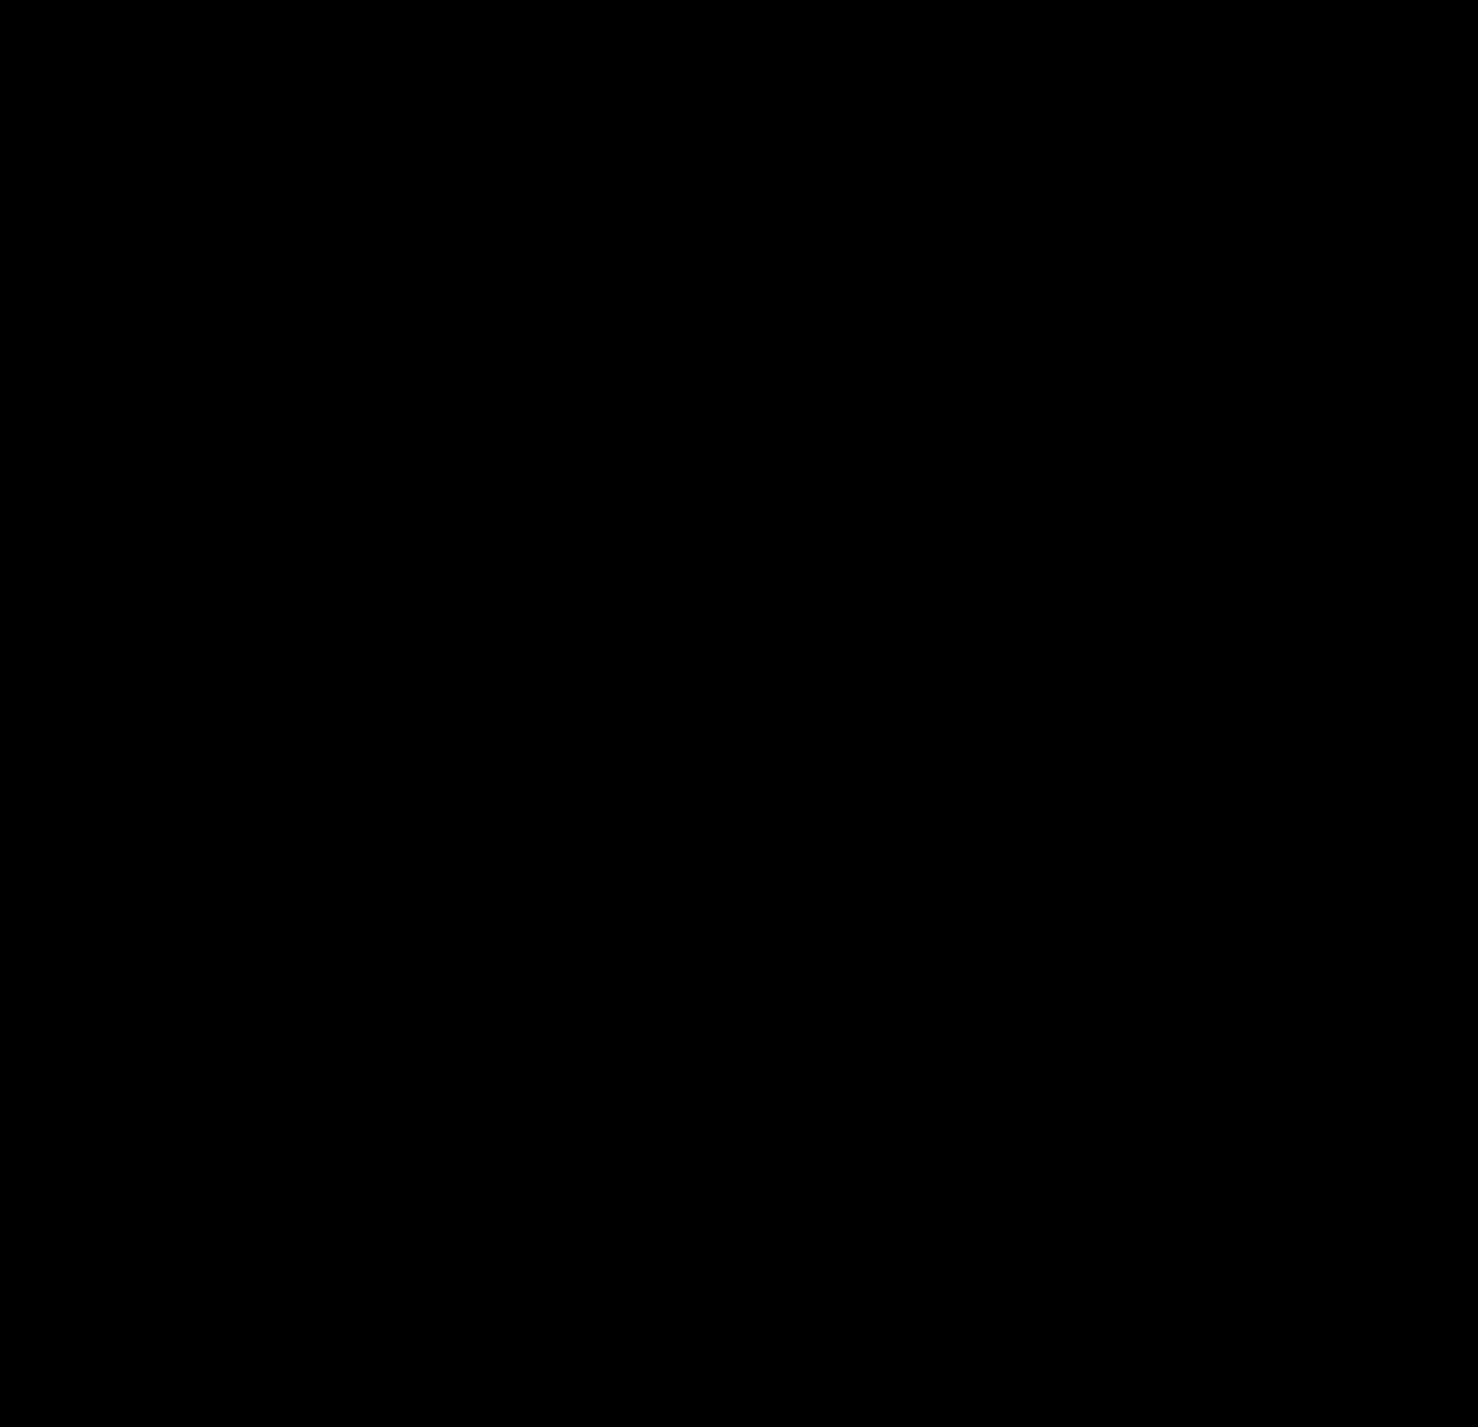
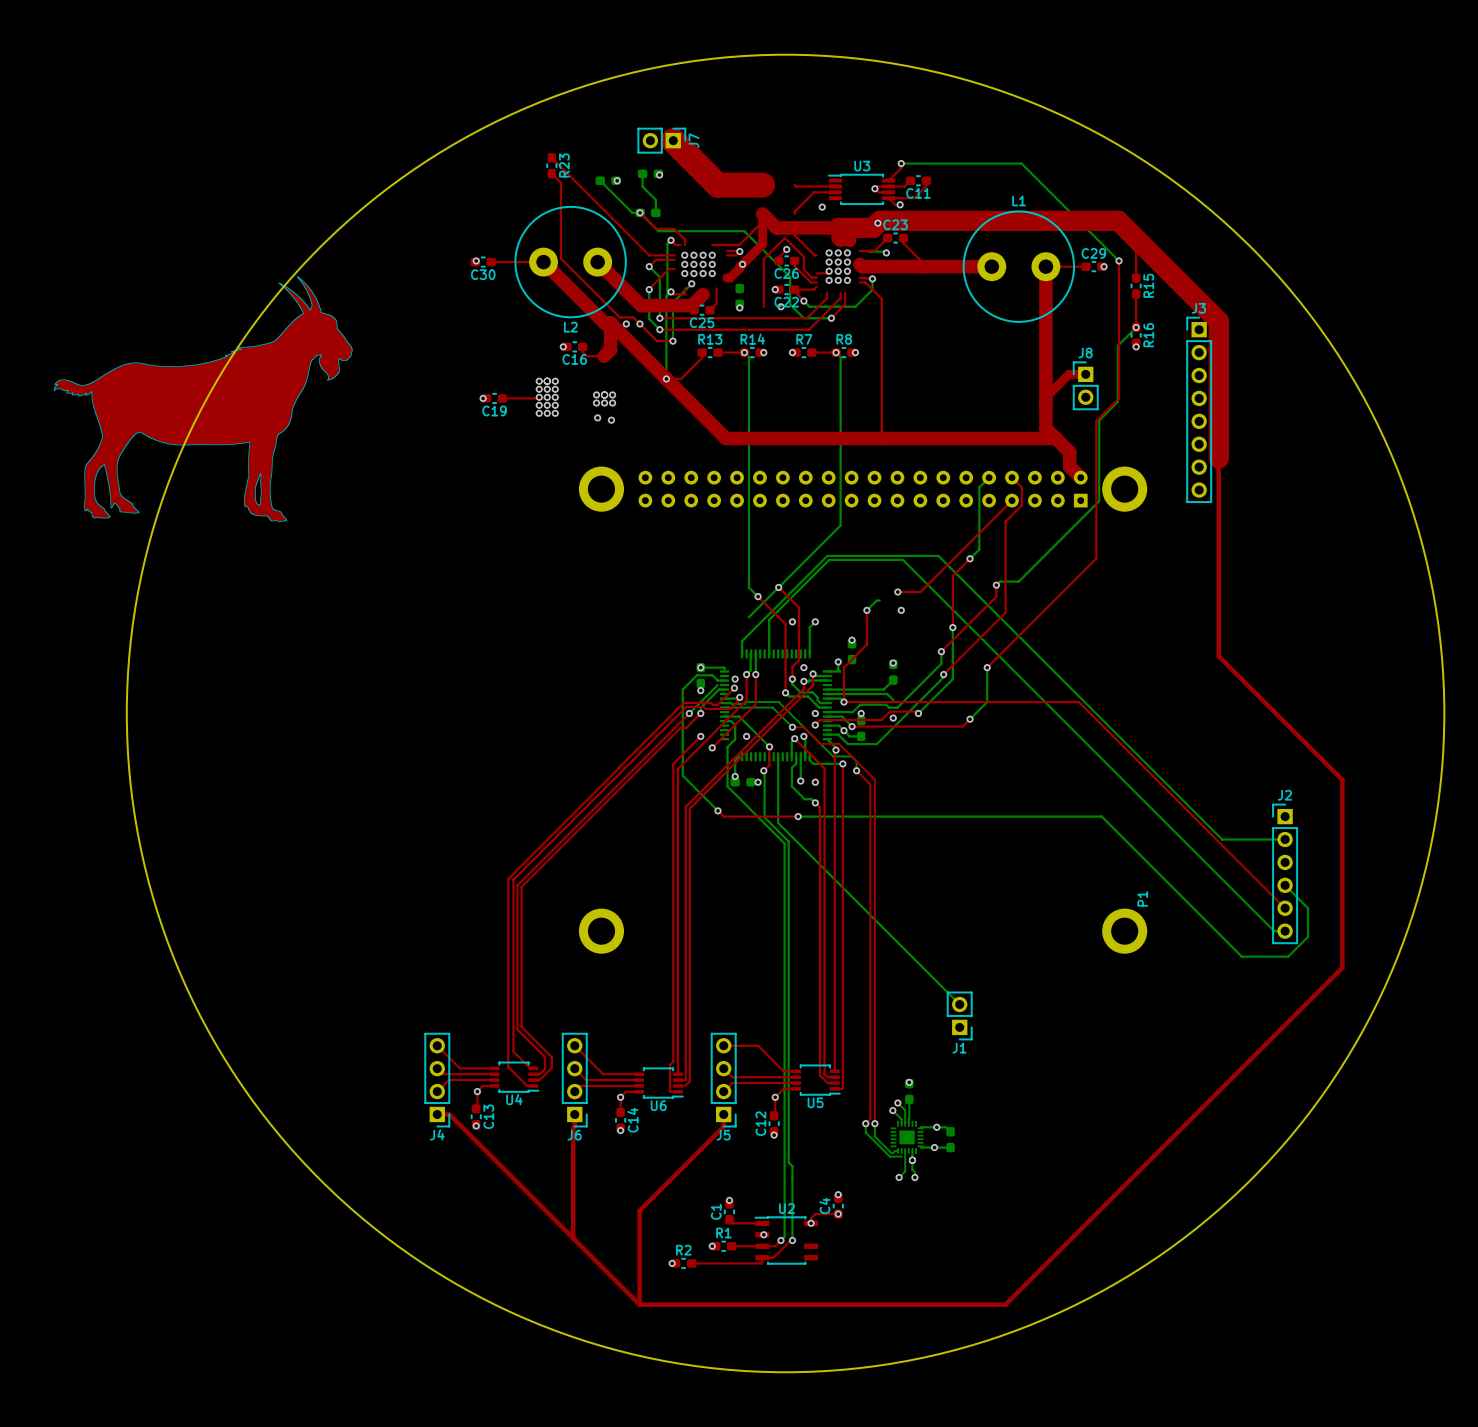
round board edge: none -> [125, 53, 1446, 1374]
J7: none -> (661, 140)
top track: none -> (673, 140) (717, 185) (762, 185)
top track: none -> (551, 157) (649, 255) (674, 255)
top track: none -> (901, 163) (901, 168) (888, 180)
bottom track: none -> (901, 163) (1021, 163) (1118, 260)
via: none -> (901, 163)
R23: none -> (551, 165)
top track: none -> (551, 173) (560, 182) (560, 258) (619, 317) (633, 317) (657, 341) (672, 341)
bottom track: none -> (642, 173) (642, 186) (655, 199) (655, 212)
part: none -> (650, 173)
via: none -> (659, 175)
bottom track: none -> (600, 180) (632, 212) (640, 212) (658, 231) (744, 231) (790, 276) (790, 304) (803, 318) (831, 318)
part: none -> (608, 180)
via: none -> (617, 180)
top track: none -> (910, 180) (904, 186) (877, 186) (874, 188) (878, 192) (888, 192)
C11: none -> (918, 180)
top track: none -> (926, 180) (926, 185) (914, 198) (888, 198) (895, 204) (900, 204)
top track: none -> (794, 185) (835, 186)
via: none -> (874, 188)
U3: none -> (861, 189)
top track: none -> (835, 192) (814, 192) (794, 211) (794, 213)
via: none -> (900, 204)
via: none -> (822, 207)
top track: none -> (640, 212) (656, 228) (674, 228) (685, 239) (685, 245)
via: none -> (640, 212)
part: none -> (647, 212)
top track: none -> (762, 213) (762, 221) (739, 245) (712, 245)
top track: none -> (762, 213) (776, 227) (847, 227) (847, 238) (849, 240)
top track: none -> (762, 213) (762, 244) (730, 277) (726, 277)
via: none -> (877, 223)
top track: none -> (794, 227) (794, 235) (816, 255)
top track: none -> (887, 238) (874, 250) (859, 250)
C23: none -> (895, 238)
top track: none -> (903, 238) (903, 243) (924, 263) (924, 266)
top track: none -> (671, 240) (675, 245) (680, 245)
bottom track: none -> (671, 240) (667, 243) (667, 295)
via: none -> (671, 240)
top track: none -> (840, 240) (838, 238) (838, 227) (873, 227) (880, 220) (1118, 220) (1218, 321) (1218, 656) (1342, 779) (1342, 967) (1005, 1304) (639, 1304)
top track: none -> (1141, 244) (1136, 250) (1136, 278)
top track: none -> (786, 249) (778, 257) (778, 260)
via: none -> (786, 249)
top track: none -> (726, 250) (739, 251) (735, 255) (726, 255)
via: none -> (739, 251)
bottom track: none -> (868, 251) (886, 252)
via: none -> (829, 252)
via: none -> (838, 252)
via: none -> (847, 252)
via: none -> (886, 252)
via: none -> (684, 255)
via: none -> (693, 255)
via: none -> (703, 255)
via: none -> (712, 255)
top track: none -> (674, 259) (656, 259) (649, 266)
via: none -> (476, 260)
C26: none -> (786, 260)
top track: none -> (794, 260) (794, 266) (810, 282) (816, 282)
top track: none -> (1118, 260) (1118, 398) (1096, 421) (1096, 558) (987, 667)
via: none -> (1118, 260)
C30: none -> (483, 262)
top track: none -> (491, 262) (543, 262) (604, 323) (610, 323)
L2: none -> (570, 262)
top track: none -> (597, 262) (641, 305) (691, 305) (703, 294)
via: none -> (829, 262)
via: none -> (838, 262)
via: none -> (847, 262)
via: none -> (684, 264)
via: none -> (693, 264)
via: none -> (703, 264)
via: none -> (712, 264)
via: none -> (742, 264)
top track: none -> (859, 264) (862, 266) (991, 266)
bottom track: none -> (649, 266) (659, 277) (659, 318)
via: none -> (649, 266)
L1: none -> (1018, 266)
top track: none -> (1086, 266) (1045, 266) (1045, 428) (1069, 452) (1069, 466) (1080, 477)
C29: none -> (1093, 266)
via: none -> (1104, 266)
top track: none -> (674, 268) (669, 268) (649, 289)
top track: none -> (829, 271) (826, 273) (816, 273)
via: none -> (829, 271)
via: none -> (838, 271)
via: none -> (847, 271)
via: none -> (684, 273)
via: none -> (693, 273)
via: none -> (703, 273)
via: none -> (712, 273)
drawing: none -> [53, 276, 353, 522]
top track: none -> (816, 277) (811, 277) (803, 269) (803, 256) (784, 238) (763, 259) (763, 306)
top track: none -> (859, 277) (872, 278)
bottom track: none -> (872, 278) (872, 289) (855, 306) (809, 306) (803, 301)
via: none -> (872, 278)
via: none -> (829, 280)
via: none -> (838, 280)
via: none -> (847, 280)
top track: none -> (859, 282) (865, 282) (881, 298) (881, 438)
bottom track: none -> (691, 283) (672, 302) (672, 341)
via: none -> (691, 283)
top track: none -> (816, 286) (814, 289) (794, 289) (803, 301)
R15: none -> (1136, 286)
top track: none -> (685, 288) (684, 294) (673, 294) (671, 291)
top track: none -> (716, 288) (716, 303) (709, 310)
bottom track: none -> (649, 289) (649, 319) (659, 329)
via: none -> (649, 289)
via: none -> (775, 289)
C22: none -> (786, 289)
bottom track: none -> (671, 291) (666, 296) (666, 378)
via: none -> (671, 291)
top track: none -> (827, 292) (827, 298) (807, 318) (659, 318)
top track: none -> (840, 292) (840, 298) (809, 329) (659, 329)
top track: none -> (845, 292) (845, 304) (831, 318)
top track: none -> (1136, 293) (1136, 327)
part: none -> (739, 296)
via: none -> (803, 301)
via: none -> (780, 306)
via: none -> (739, 307)
C25: none -> (702, 310)
via: none -> (659, 318)
via: none -> (831, 318)
top track: none -> (610, 323) (726, 438) (1055, 438)
top track: none -> (610, 323) (610, 349) (604, 356) (586, 356) (582, 352) (582, 346)
via: none -> (626, 323)
via: none -> (639, 323)
bottom track: none -> (1136, 327) (1117, 345) (1117, 401) (1099, 420) (1099, 501) (1018, 581) (999, 581) (996, 585)
via: none -> (1136, 327)
via: none -> (659, 329)
R16: none -> (1136, 335)
via: none -> (672, 341)
via: none -> (563, 346)
C16: none -> (574, 346)
via: none -> (1136, 346)
top track: none -> (702, 352) (702, 357) (681, 378) (666, 378)
R13: none -> (710, 352)
top track: none -> (717, 352) (744, 352)
bottom track: none -> (744, 352) (748, 357) (748, 587) (758, 596)
via: none -> (744, 352)
R14: none -> (752, 352)
via: none -> (763, 352)
via: none -> (792, 352)
R7: none -> (803, 352)
top track: none -> (811, 352) (836, 352)
bottom track: none -> (836, 352) (840, 357) (840, 525) (748, 617)
via: none -> (836, 352)
R8: none -> (844, 352)
via: none -> (855, 352)
top track: none -> (1085, 374) (1069, 374) (1045, 397) (1045, 401)
via: none -> (666, 378)
via: none -> (539, 381)
via: none -> (547, 381)
via: none -> (555, 381)
J8: none -> (1085, 385)
via: none -> (539, 389)
via: none -> (547, 389)
via: none -> (555, 389)
top track: none -> (549, 394) (546, 398) (502, 398)
via: none -> (596, 394)
via: none -> (604, 394)
via: none -> (612, 394)
via: none -> (539, 397)
via: none -> (547, 397)
via: none -> (555, 397)
via: none -> (483, 398)
C19: none -> (494, 398)
via: none -> (596, 403)
via: none -> (604, 403)
via: none -> (612, 403)
via: none -> (539, 405)
via: none -> (547, 405)
via: none -> (555, 405)
J3: none -> (1199, 409)
via: none -> (539, 413)
via: none -> (547, 413)
via: none -> (555, 413)
via: none -> (597, 417)
via: none -> (611, 420)
bottom track: none -> (989, 477) (979, 487) (979, 549) (970, 558)
top track: none -> (1012, 477) (1021, 487) (1021, 505) (1005, 521) (1005, 612) (943, 674)
top track: none -> (1012, 500) (920, 592) (897, 592)
top track: none -> (970, 558) (952, 576) (952, 627)
via: none -> (970, 558)
top track: none -> (996, 585) (996, 596) (941, 651)
via: none -> (996, 585)
top track: none -> (778, 587) (798, 607) (798, 660) (792, 666) (792, 679)
via: none -> (778, 587)
via: none -> (897, 592)
top track: none -> (758, 596) (785, 624) (785, 692)
via: none -> (758, 596)
bottom track: none -> (879, 600) (876, 600) (866, 610)
top track: none -> (866, 610) (866, 644) (844, 667) (844, 702) (1078, 702) (1285, 908)
via: none -> (866, 610)
via: none -> (901, 610)
via: none -> (792, 621)
bottom track: none -> (815, 621) (809, 627) (809, 653)
via: none -> (815, 621)
bottom track: none -> (952, 627) (952, 679) (918, 713)
via: none -> (952, 627)
via: none -> (852, 640)
part: none -> (852, 651)
bottom track: none -> (941, 651) (941, 663) (897, 707) (889, 707) (886, 704) (860, 704) (852, 712) (827, 712)
via: none -> (941, 651)
bottom track: none -> (742, 653) (742, 641) (827, 555) (938, 555) (1222, 839) (1285, 839)
bottom track: none -> (751, 653) (750, 670) (746, 674)
bottom track: none -> (755, 653) (755, 674)
bottom track: none -> (769, 653) (769, 619) (829, 559) (903, 559) (1274, 931) (1285, 931)
bottom track: none -> (838, 661) (840, 671) (827, 671)
via: none -> (838, 661)
via: none -> (893, 663)
bottom track: none -> (700, 667) (724, 667) (724, 671)
via: none -> (700, 667)
via: none -> (803, 667)
bottom track: none -> (987, 667) (987, 702) (970, 719)
via: none -> (987, 667)
part: none -> (893, 672)
top track: none -> (813, 673) (813, 685) (689, 808) (689, 1081) (685, 1085) (677, 1085)
bottom track: none -> (813, 673) (815, 676) (827, 676)
via: none -> (813, 673)
top track: none -> (746, 674) (746, 700) (677, 768) (677, 1074)
via: none -> (746, 674)
top track: none -> (755, 674) (755, 704) (712, 747)
via: none -> (755, 674)
bottom track: none -> (943, 674) (943, 677) (876, 744) (847, 744) (838, 734) (827, 734)
via: none -> (943, 674)
part: none -> (700, 675)
via: none -> (735, 679)
bottom track: none -> (792, 679) (792, 684) (800, 692) (812, 692) (820, 703) (827, 703)
via: none -> (792, 679)
bottom track: none -> (724, 680) (717, 680) (712, 675) (697, 675) (682, 689) (682, 775) (717, 810)
bottom track: none -> (827, 680) (803, 681)
bottom track: none -> (893, 680) (883, 689) (827, 689)
top track: none -> (803, 681) (803, 688) (685, 806) (685, 1079) (677, 1080)
via: none -> (803, 681)
bottom track: none -> (717, 685) (689, 713)
top track: none -> (734, 688) (717, 704) (710, 702) (683, 702) (508, 879) (508, 1067) (527, 1085) (533, 1085)
via: none -> (734, 688)
bottom track: none -> (724, 689) (718, 689) (700, 707) (700, 713)
via: none -> (700, 690)
bottom track: none -> (785, 692) (789, 696) (808, 696) (819, 707) (827, 707)
via: none -> (785, 692)
bottom track: none -> (827, 694) (887, 694) (893, 699)
top track: none -> (739, 697) (730, 709) (686, 706) (513, 879) (513, 1051) (530, 1068) (533, 1068)
bottom track: none -> (739, 697) (724, 698)
via: none -> (739, 697)
bottom track: none -> (827, 698) (840, 698) (844, 702)
via: none -> (844, 702)
bottom track: none -> (724, 703) (778, 702) (833, 756) (851, 756) (856, 761) (856, 770)
part: none -> (775, 705)
bottom track: none -> (724, 707) (772, 707) (792, 727)
P1: none -> (863, 710)
top track: none -> (689, 713) (517, 885) (517, 1029) (544, 1057) (544, 1068) (539, 1074) (533, 1074)
via: none -> (689, 713)
top track: none -> (700, 713) (686, 727) (680, 727) (521, 887) (521, 1026) (551, 1057) (551, 1067) (539, 1080) (533, 1080)
via: none -> (700, 713)
via: none -> (815, 713)
via: none -> (861, 713)
top track: none -> (918, 713) (916, 711) (890, 711) (881, 720) (820, 720) (815, 725)
via: none -> (918, 713)
bottom track: none -> (724, 716) (739, 716) (769, 746)
bottom track: none -> (827, 716) (842, 716) (852, 726)
via: none -> (893, 718)
top track: none -> (970, 719) (962, 726) (852, 726)
via: none -> (970, 719)
bottom track: none -> (724, 721) (731, 721) (735, 725) (735, 739) (727, 747) (727, 786) (784, 843) (784, 1236) (780, 1240)
via: none -> (815, 725)
bottom track: none -> (827, 725) (838, 725) (849, 736) (861, 736) (858, 739)
via: none -> (852, 726)
top track: none -> (792, 727) (803, 727) (820, 743) (839, 743) (874, 779) (874, 1123)
via: none -> (792, 727)
part: none -> (861, 728)
via: none -> (844, 730)
top track: none -> (700, 736) (673, 763) (673, 1061) (669, 1065) (669, 1091) (677, 1091)
via: none -> (700, 736)
via: none -> (746, 736)
bottom track: none -> (803, 736) (805, 756)
via: none -> (803, 736)
top track: none -> (794, 738) (824, 768) (824, 1074) (827, 1077) (834, 1077)
bottom track: none -> (794, 738) (791, 741) (791, 756)
via: none -> (794, 738)
bottom track: none -> (827, 739) (835, 750)
top track: none -> (769, 746) (769, 765) (763, 770)
via: none -> (769, 746)
via: none -> (712, 747)
top track: none -> (835, 750) (834, 1071)
via: none -> (835, 750)
bottom track: none -> (742, 756) (738, 756) (735, 760) (735, 782)
bottom track: none -> (778, 756) (778, 822) (959, 1004)
bottom track: none -> (796, 756) (796, 763) (791, 767) (791, 786) (804, 799) (811, 799) (815, 802)
bottom track: none -> (800, 756) (799, 782)
bottom track: none -> (809, 756) (809, 760) (813, 763) (842, 763)
top track: none -> (842, 763) (842, 1088) (834, 1088)
via: none -> (842, 763)
bottom track: none -> (763, 770) (764, 817) (788, 841) (788, 1162) (792, 1166) (792, 1240)
via: none -> (763, 770)
top track: none -> (856, 770) (870, 784) (870, 1119) (865, 1123)
via: none -> (856, 770)
via: none -> (735, 776)
via: none -> (800, 781)
part: none -> (743, 782)
via: none -> (758, 782)
via: none -> (815, 782)
top track: none -> (815, 802) (819, 807) (819, 1075) (827, 1083) (834, 1083)
via: none -> (815, 802)
top track: none -> (717, 810) (723, 816) (798, 816)
via: none -> (717, 810)
bottom track: none -> (798, 816) (1101, 816) (1241, 956) (1288, 956) (1308, 936) (1308, 908) (1285, 885)
via: none -> (798, 816)
J2: none -> (1285, 873)
J1: none -> (959, 1015)
top track: none -> (437, 1045) (459, 1068) (494, 1068)
top track: none -> (574, 1045) (603, 1074) (639, 1074)
top track: none -> (723, 1045) (758, 1045) (783, 1071) (795, 1071)
top track: none -> (437, 1068) (442, 1074) (494, 1074)
top track: none -> (574, 1068) (586, 1080) (639, 1080)
top track: none -> (723, 1068) (732, 1077) (795, 1077)
U4: none -> (514, 1077)
J4: none -> (437, 1080)
top track: none -> (494, 1080) (448, 1080) (437, 1091)
J6: none -> (574, 1080)
J5: none -> (723, 1080)
U5: none -> (815, 1080)
via: none -> (909, 1082)
U6: none -> (658, 1083)
top track: none -> (795, 1083) (732, 1083) (723, 1091)
top track: none -> (494, 1085) (482, 1085) (477, 1091) (476, 1106)
top track: none -> (639, 1085) (580, 1085) (574, 1091)
top track: none -> (795, 1088) (783, 1088) (775, 1097) (774, 1115)
via: none -> (477, 1091)
top track: none -> (639, 1091) (626, 1091) (620, 1097) (620, 1112)
part: none -> (909, 1091)
via: none -> (620, 1097)
via: none -> (775, 1097)
bottom track: none -> (909, 1099) (908, 1123)
bottom track: none -> (897, 1103) (905, 1110) (905, 1123)
via: none -> (897, 1103)
bottom track: none -> (892, 1110) (901, 1119) (901, 1123)
via: none -> (892, 1110)
top track: none -> (437, 1114) (449, 1114) (639, 1304)
top track: none -> (574, 1114) (573, 1238)
top track: none -> (723, 1114) (723, 1126) (639, 1210) (639, 1304)
C13: none -> (476, 1116)
C14: none -> (620, 1120)
C12: none -> (774, 1123)
bottom track: none -> (865, 1123) (865, 1132) (889, 1156) (901, 1156)
via: none -> (865, 1123)
bottom track: none -> (874, 1123) (874, 1136) (891, 1152) (897, 1150)
via: none -> (874, 1123)
via: none -> (476, 1125)
via: none -> (936, 1127)
bottom track: none -> (920, 1128) (946, 1127) (950, 1131)
via: none -> (620, 1130)
via: none -> (774, 1135)
part: none -> (907, 1137)
part: none -> (950, 1139)
bottom track: none -> (920, 1146) (950, 1147)
via: none -> (934, 1147)
bottom track: none -> (905, 1150) (905, 1171) (899, 1177)
bottom track: none -> (912, 1150) (912, 1169) (914, 1172) (914, 1177)
via: none -> (912, 1160)
via: none -> (899, 1177)
via: none -> (914, 1177)
via: none -> (838, 1194)
via: none -> (729, 1200)
C4: none -> (838, 1206)
C1: none -> (729, 1211)
top track: none -> (838, 1214) (815, 1214) (811, 1218) (811, 1223)
via: none -> (838, 1214)
top track: none -> (729, 1219) (733, 1223) (762, 1223)
via: none -> (811, 1223)
via: none -> (763, 1234)
top track: none -> (780, 1240) (775, 1246) (731, 1246)
via: none -> (780, 1240)
U2: none -> (786, 1240)
top track: none -> (792, 1240) (773, 1257) (762, 1257) (761, 1263) (691, 1263)
via: none -> (792, 1240)
via: none -> (712, 1246)
R1: none -> (723, 1246)
via: none -> (672, 1263)
R2: none -> (683, 1263)

